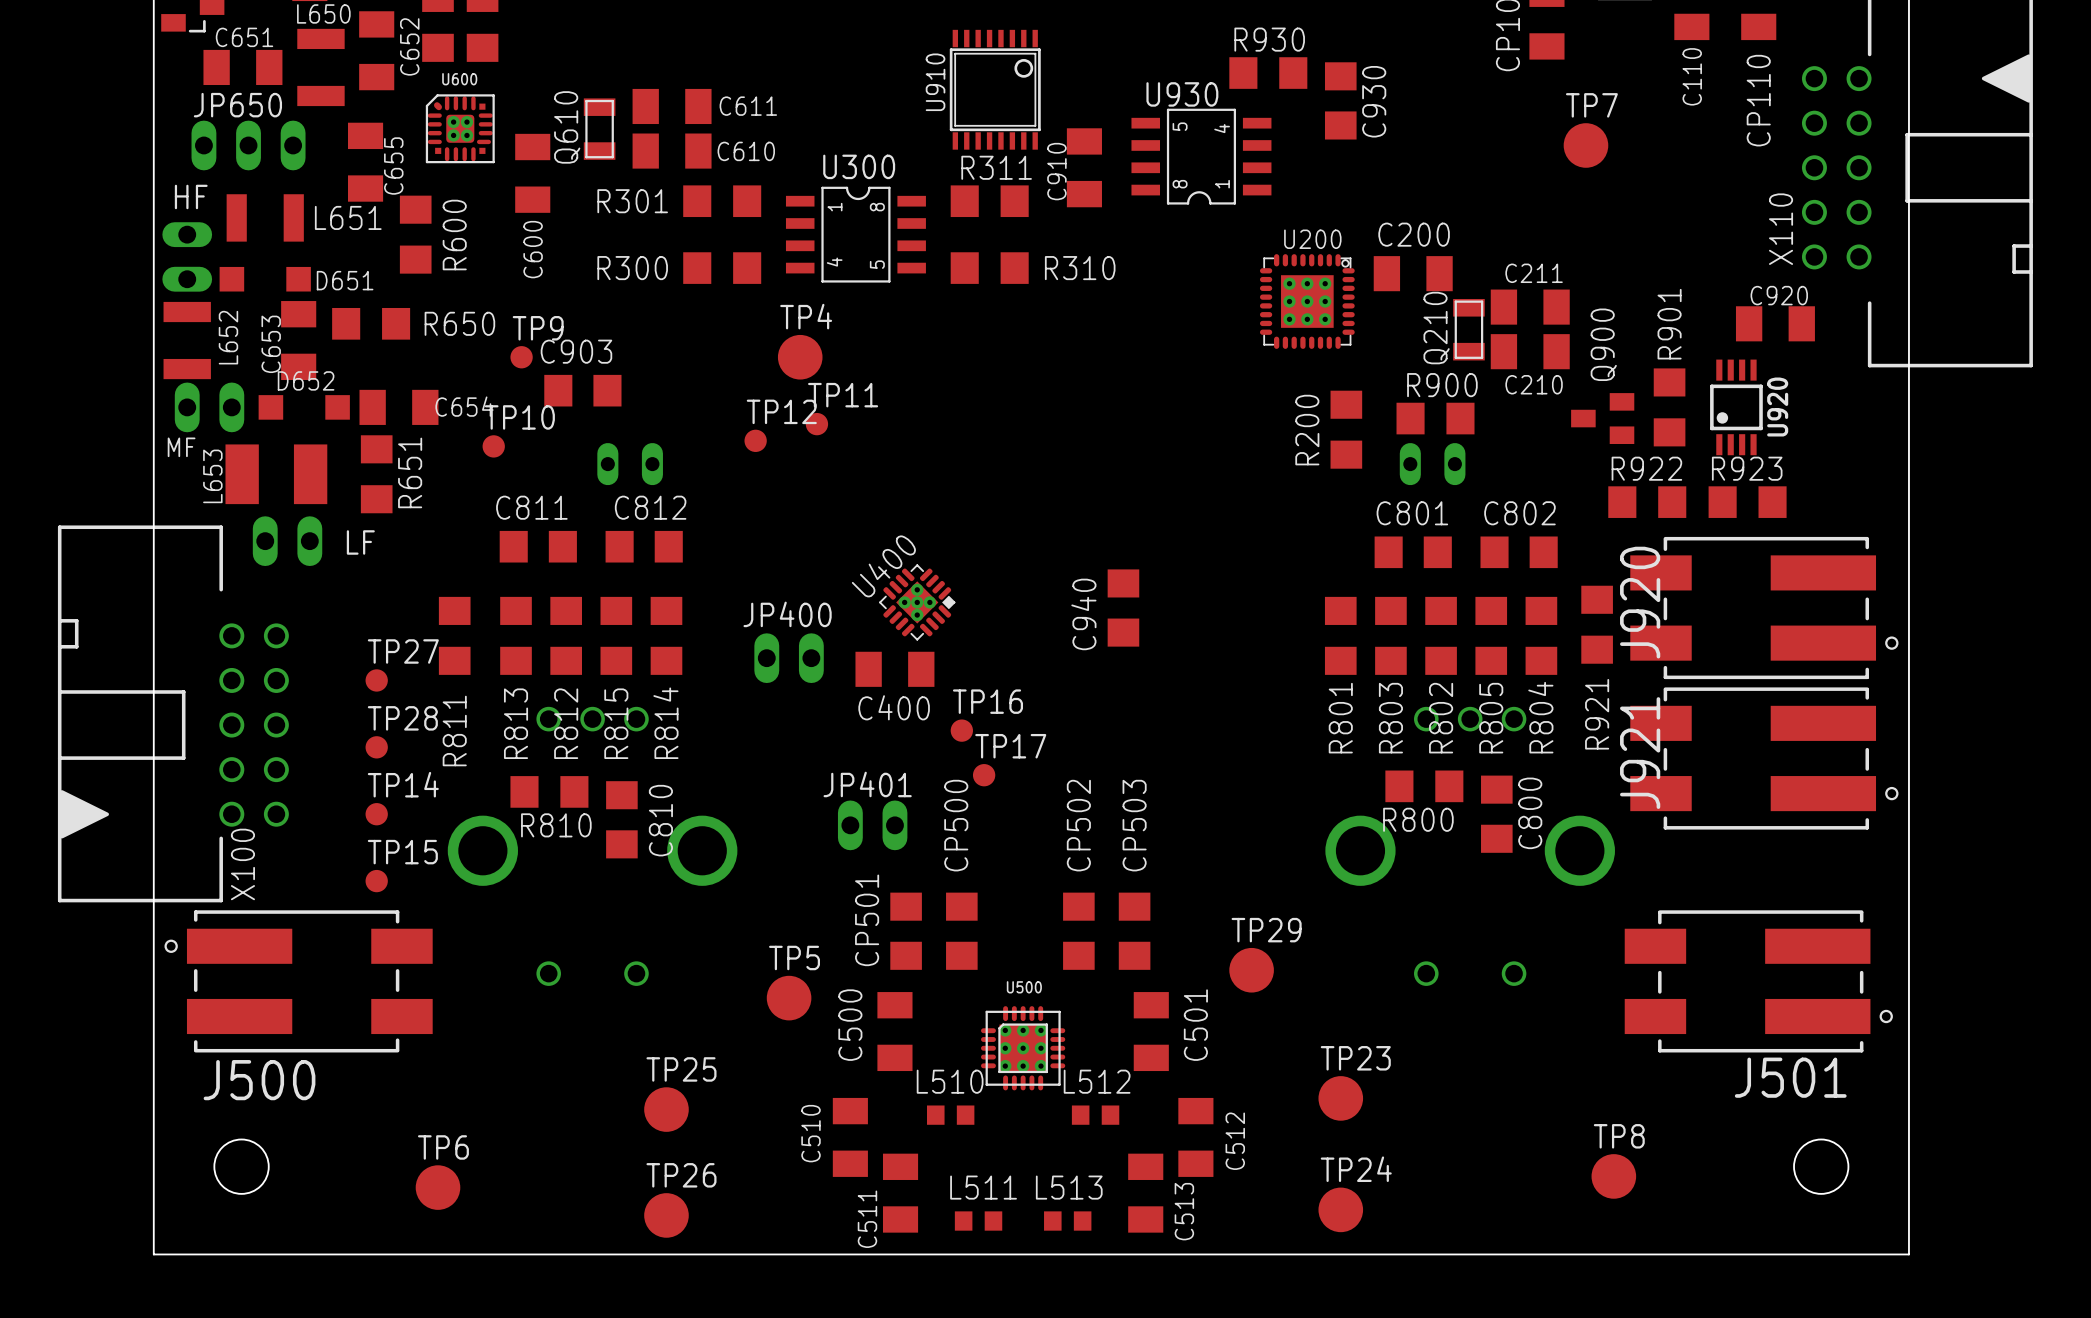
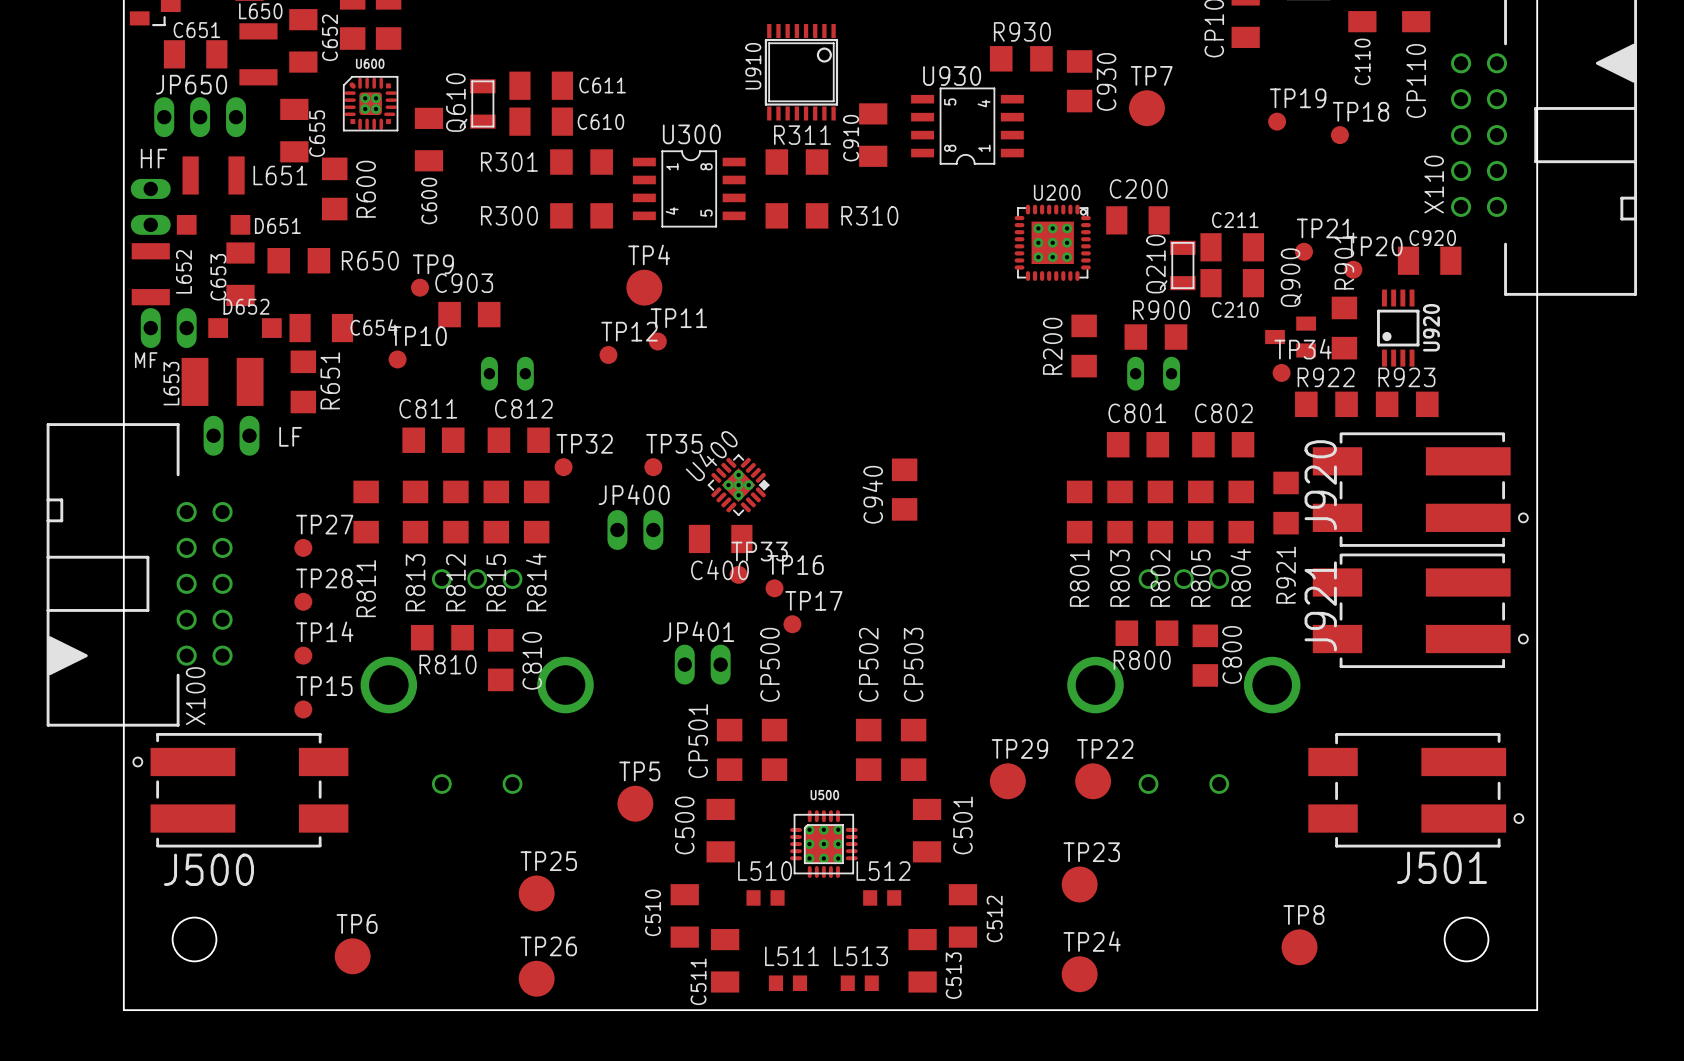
TP7 position: (1585, 145) -> (1146, 108)
TP19: none -> (1277, 121)
TP18: none -> (1339, 135)
TP21: none -> (1304, 251)
TP20: none -> (1353, 269)
TP34: none -> (1281, 372)
TP32: none -> (563, 467)
TP35: none -> (653, 467)
TP33: none -> (738, 574)
TP22: none -> (1093, 781)

